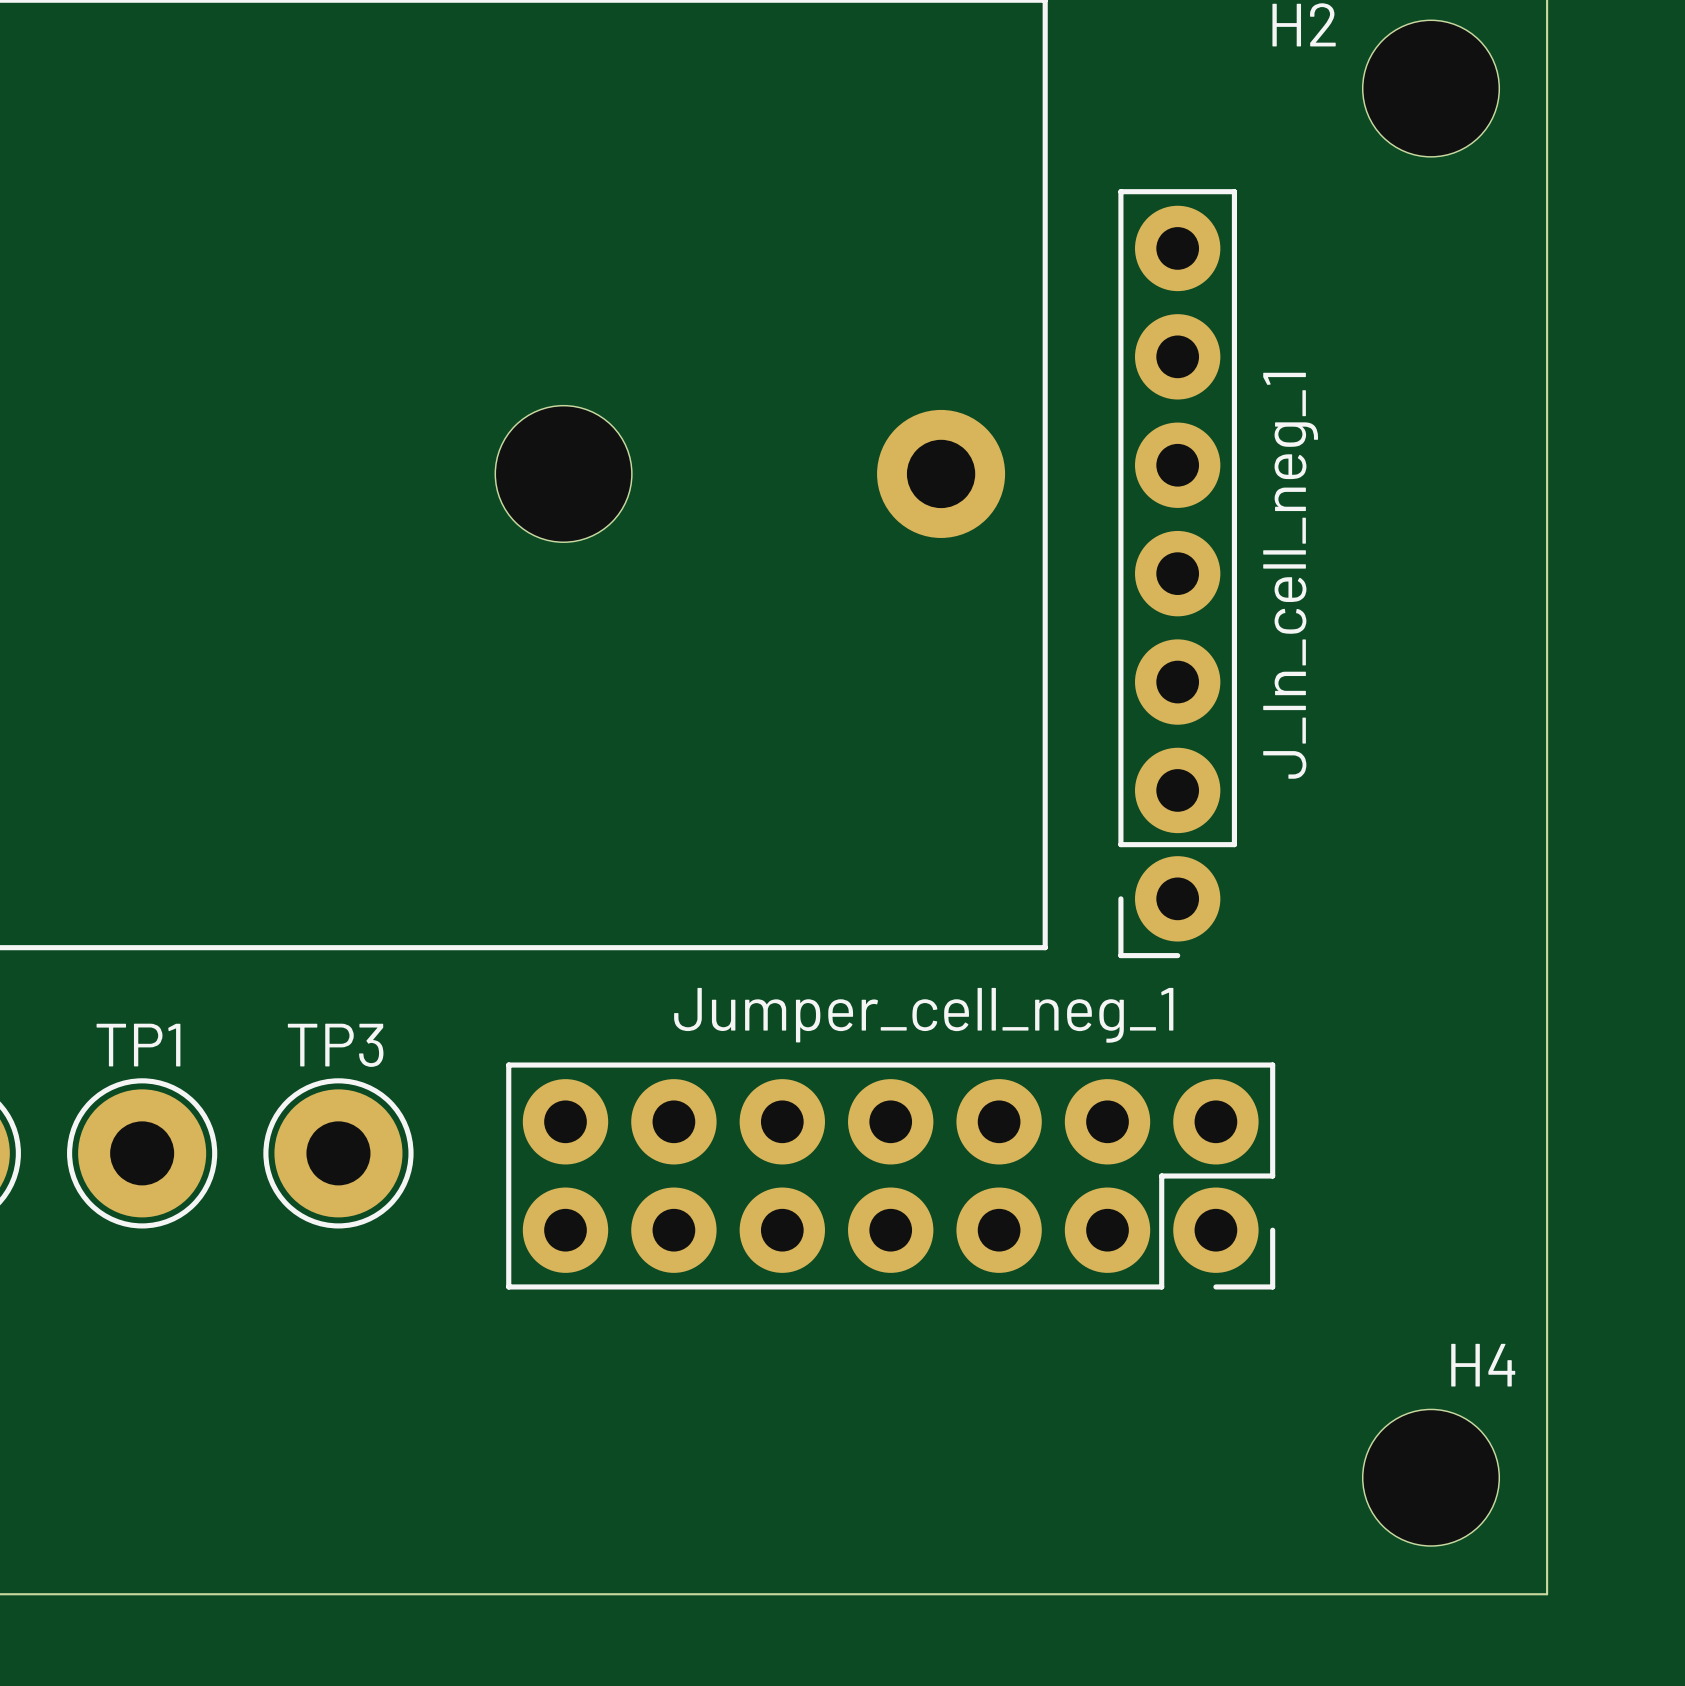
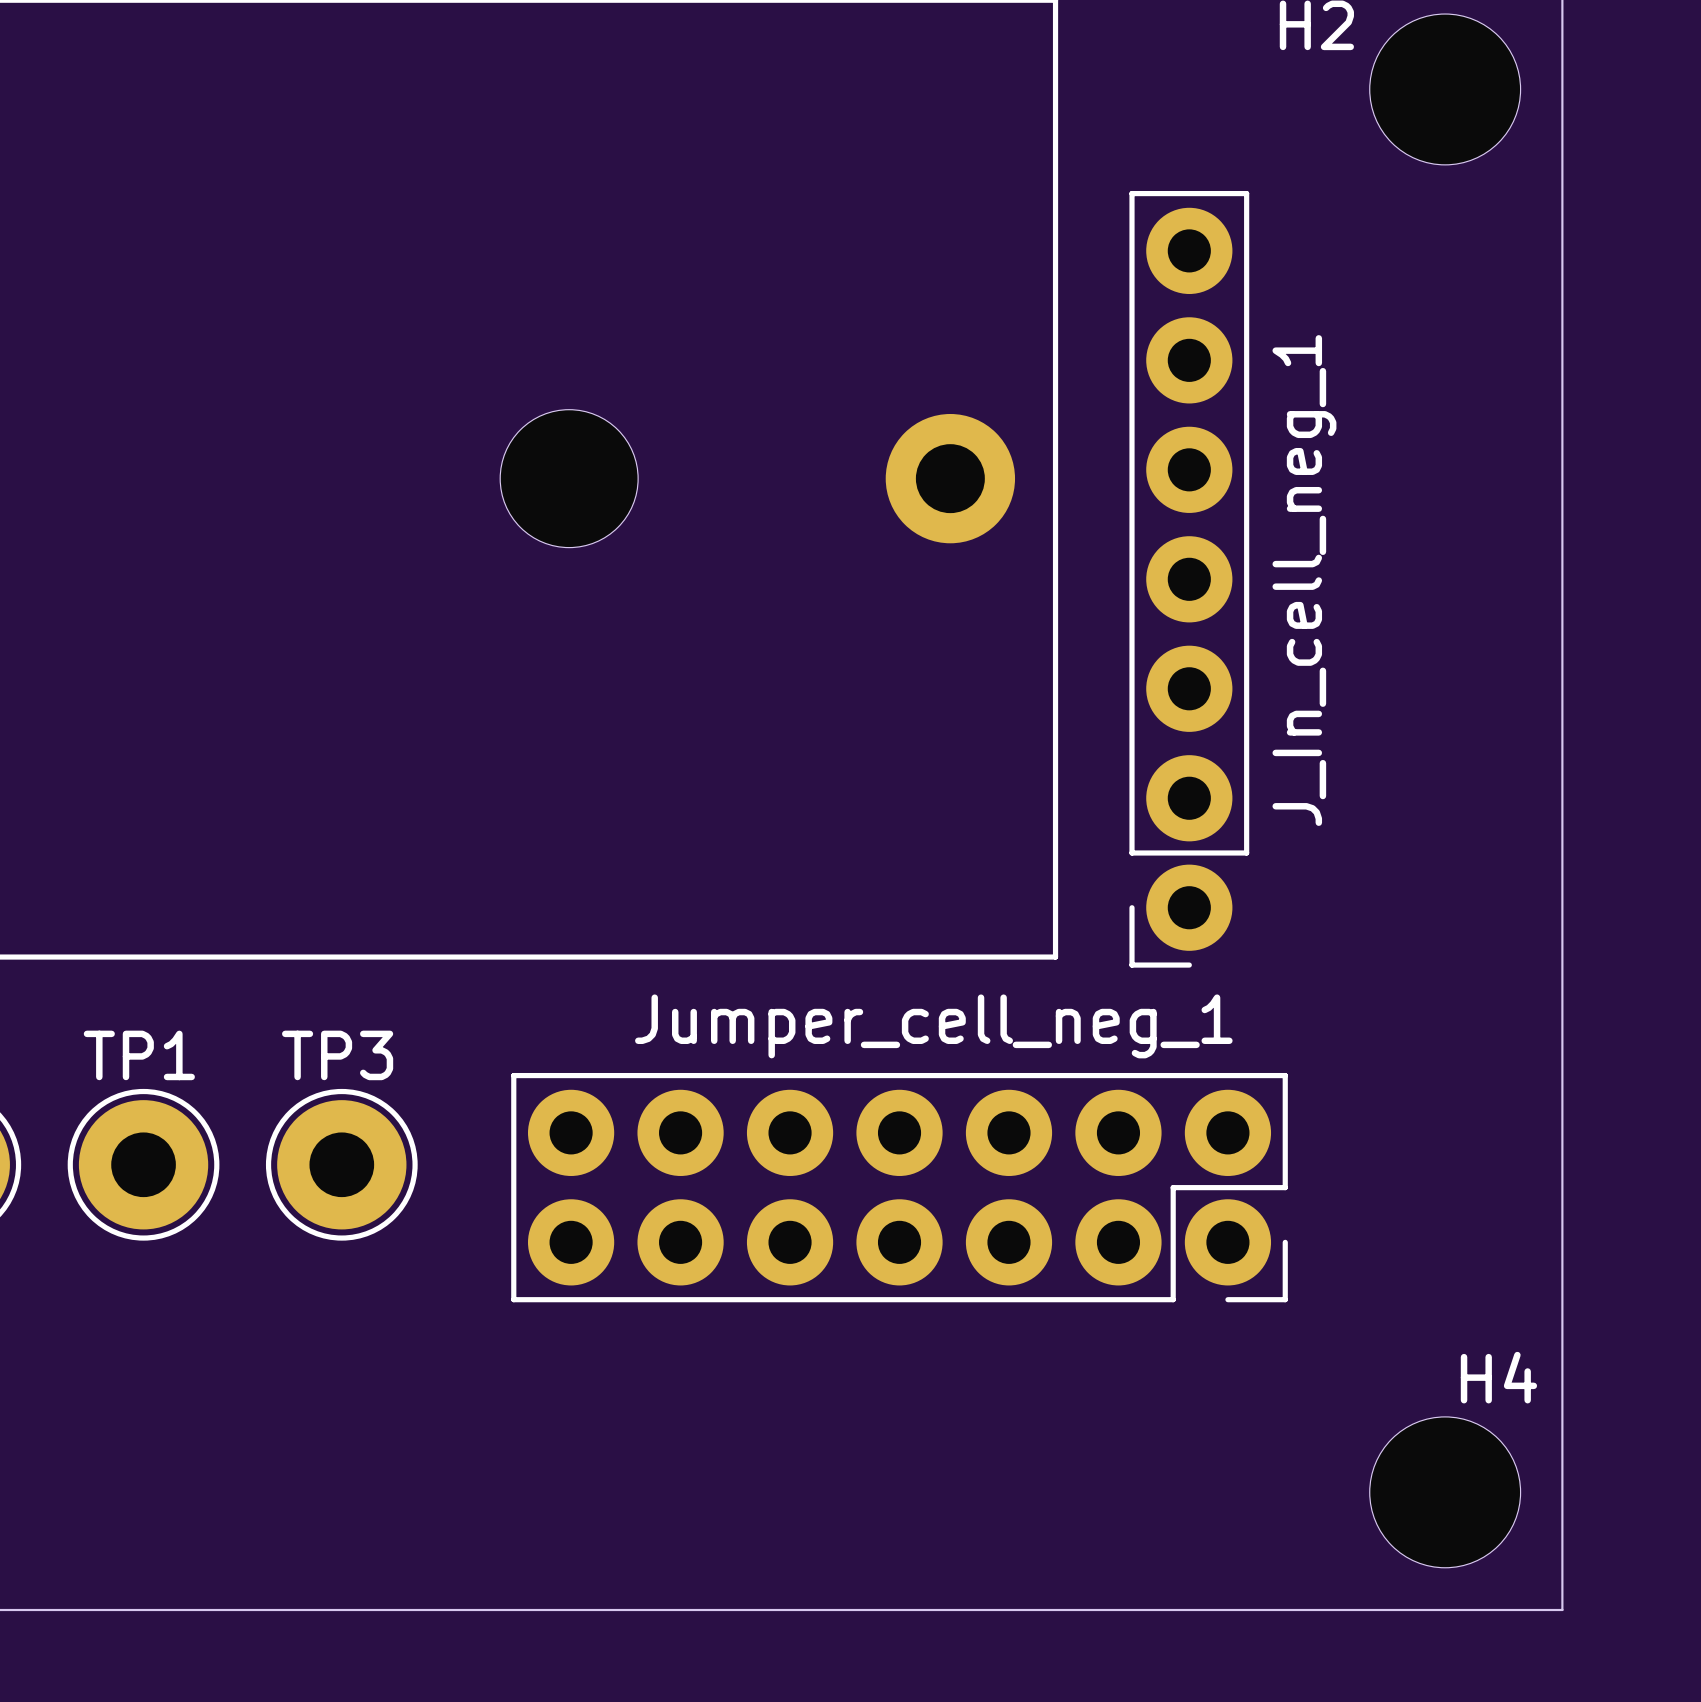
H2 footprint: [1362, 20, 1500, 157] -> [1369, 14, 1521, 165]
H4 footprint: [1362, 1409, 1500, 1547] -> [1369, 1416, 1521, 1568]

